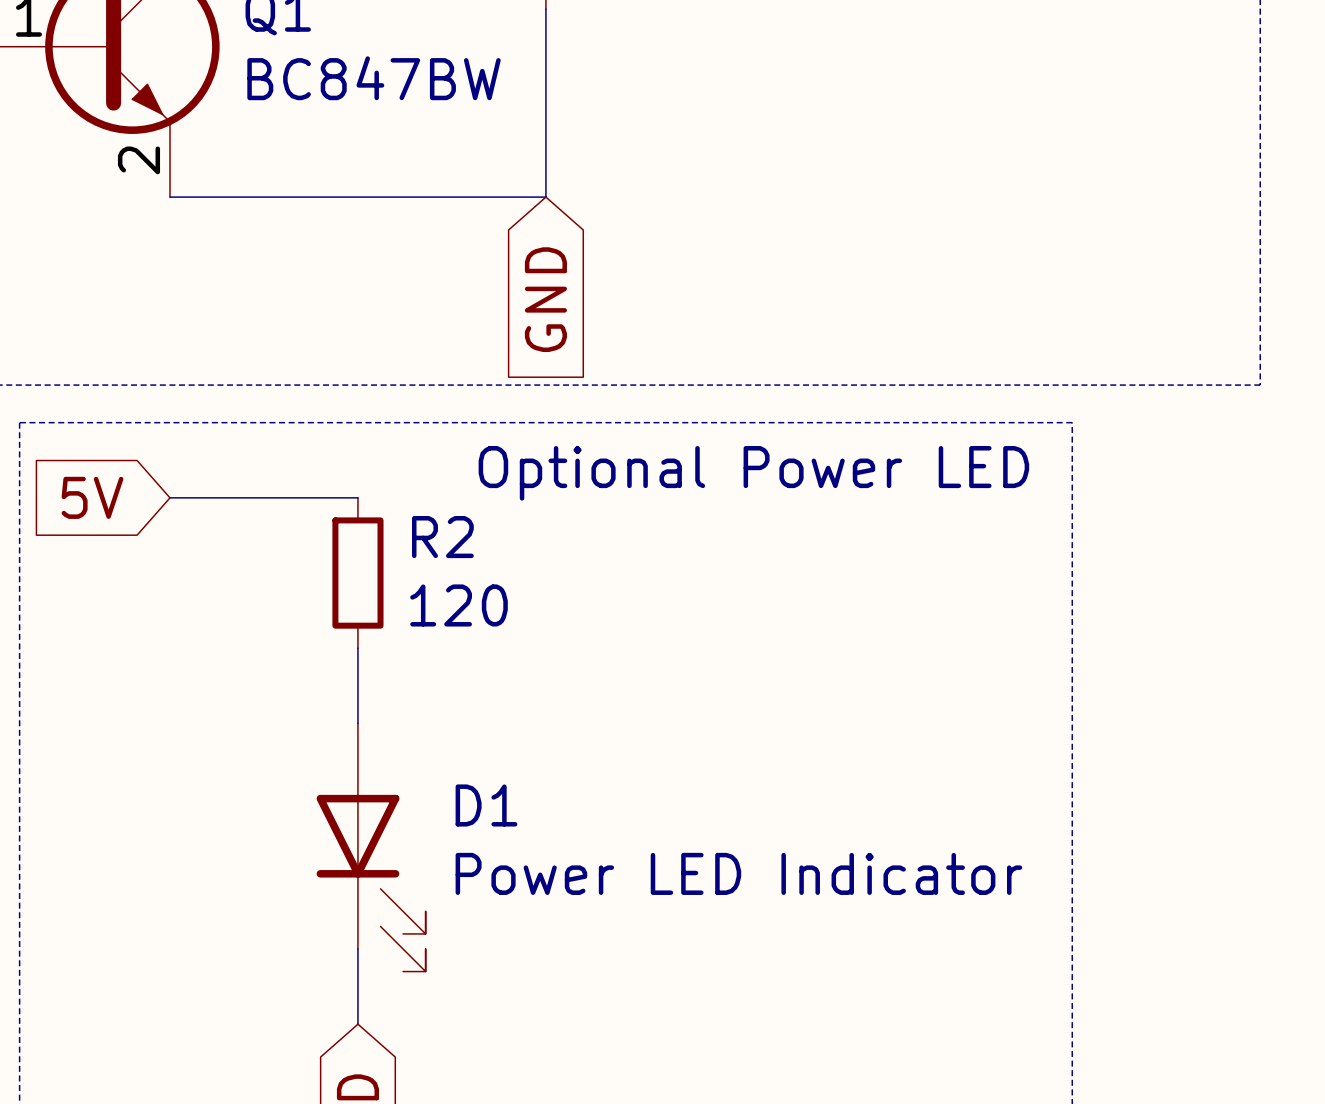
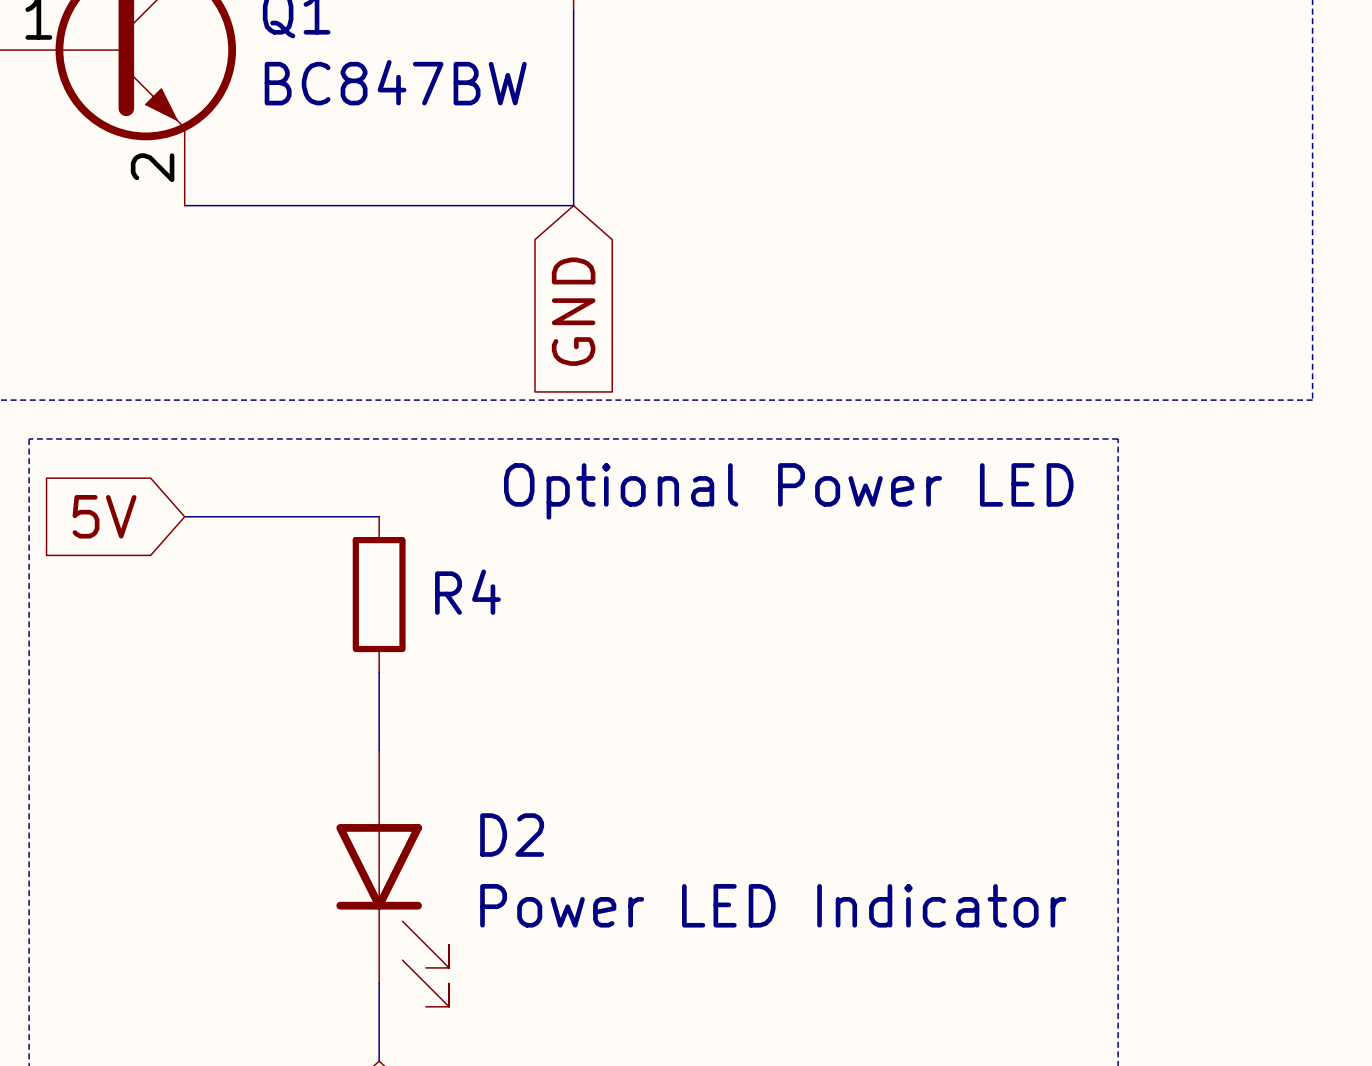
R2 name: R2 (442, 537) -> R4 (467, 592)
R2 value: 120 (459, 605) -> none
D1 name: D1 (486, 805) -> D2 (512, 835)

